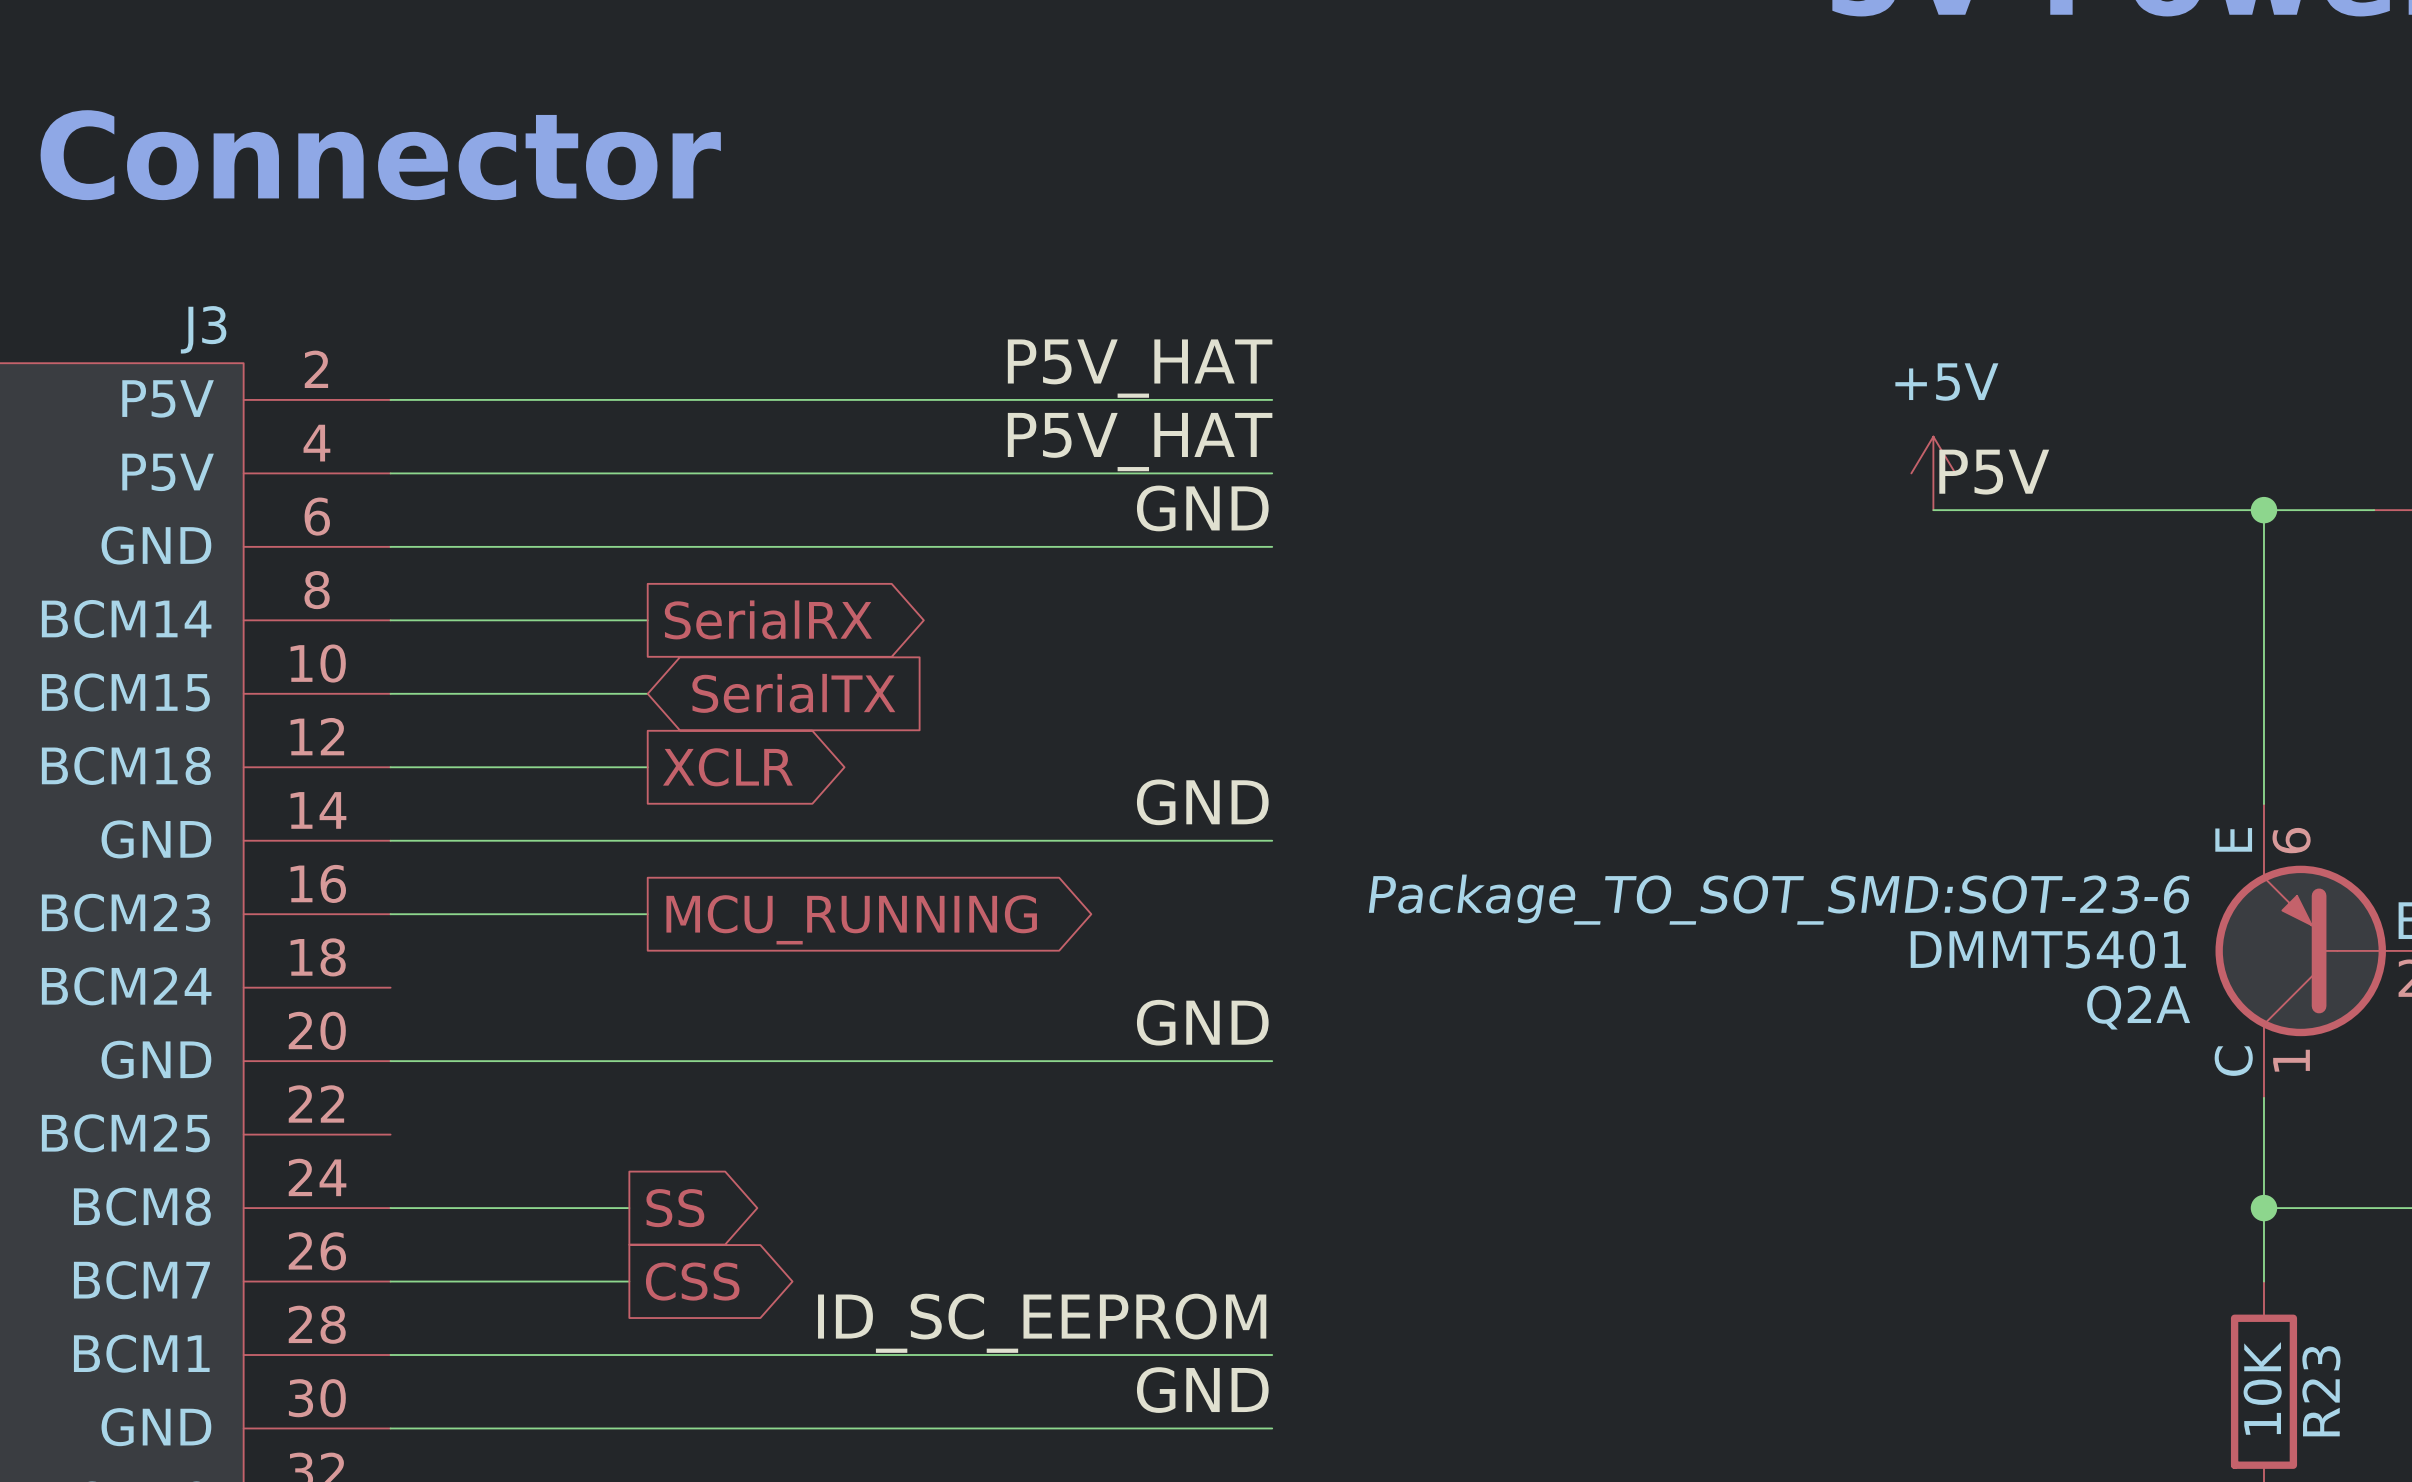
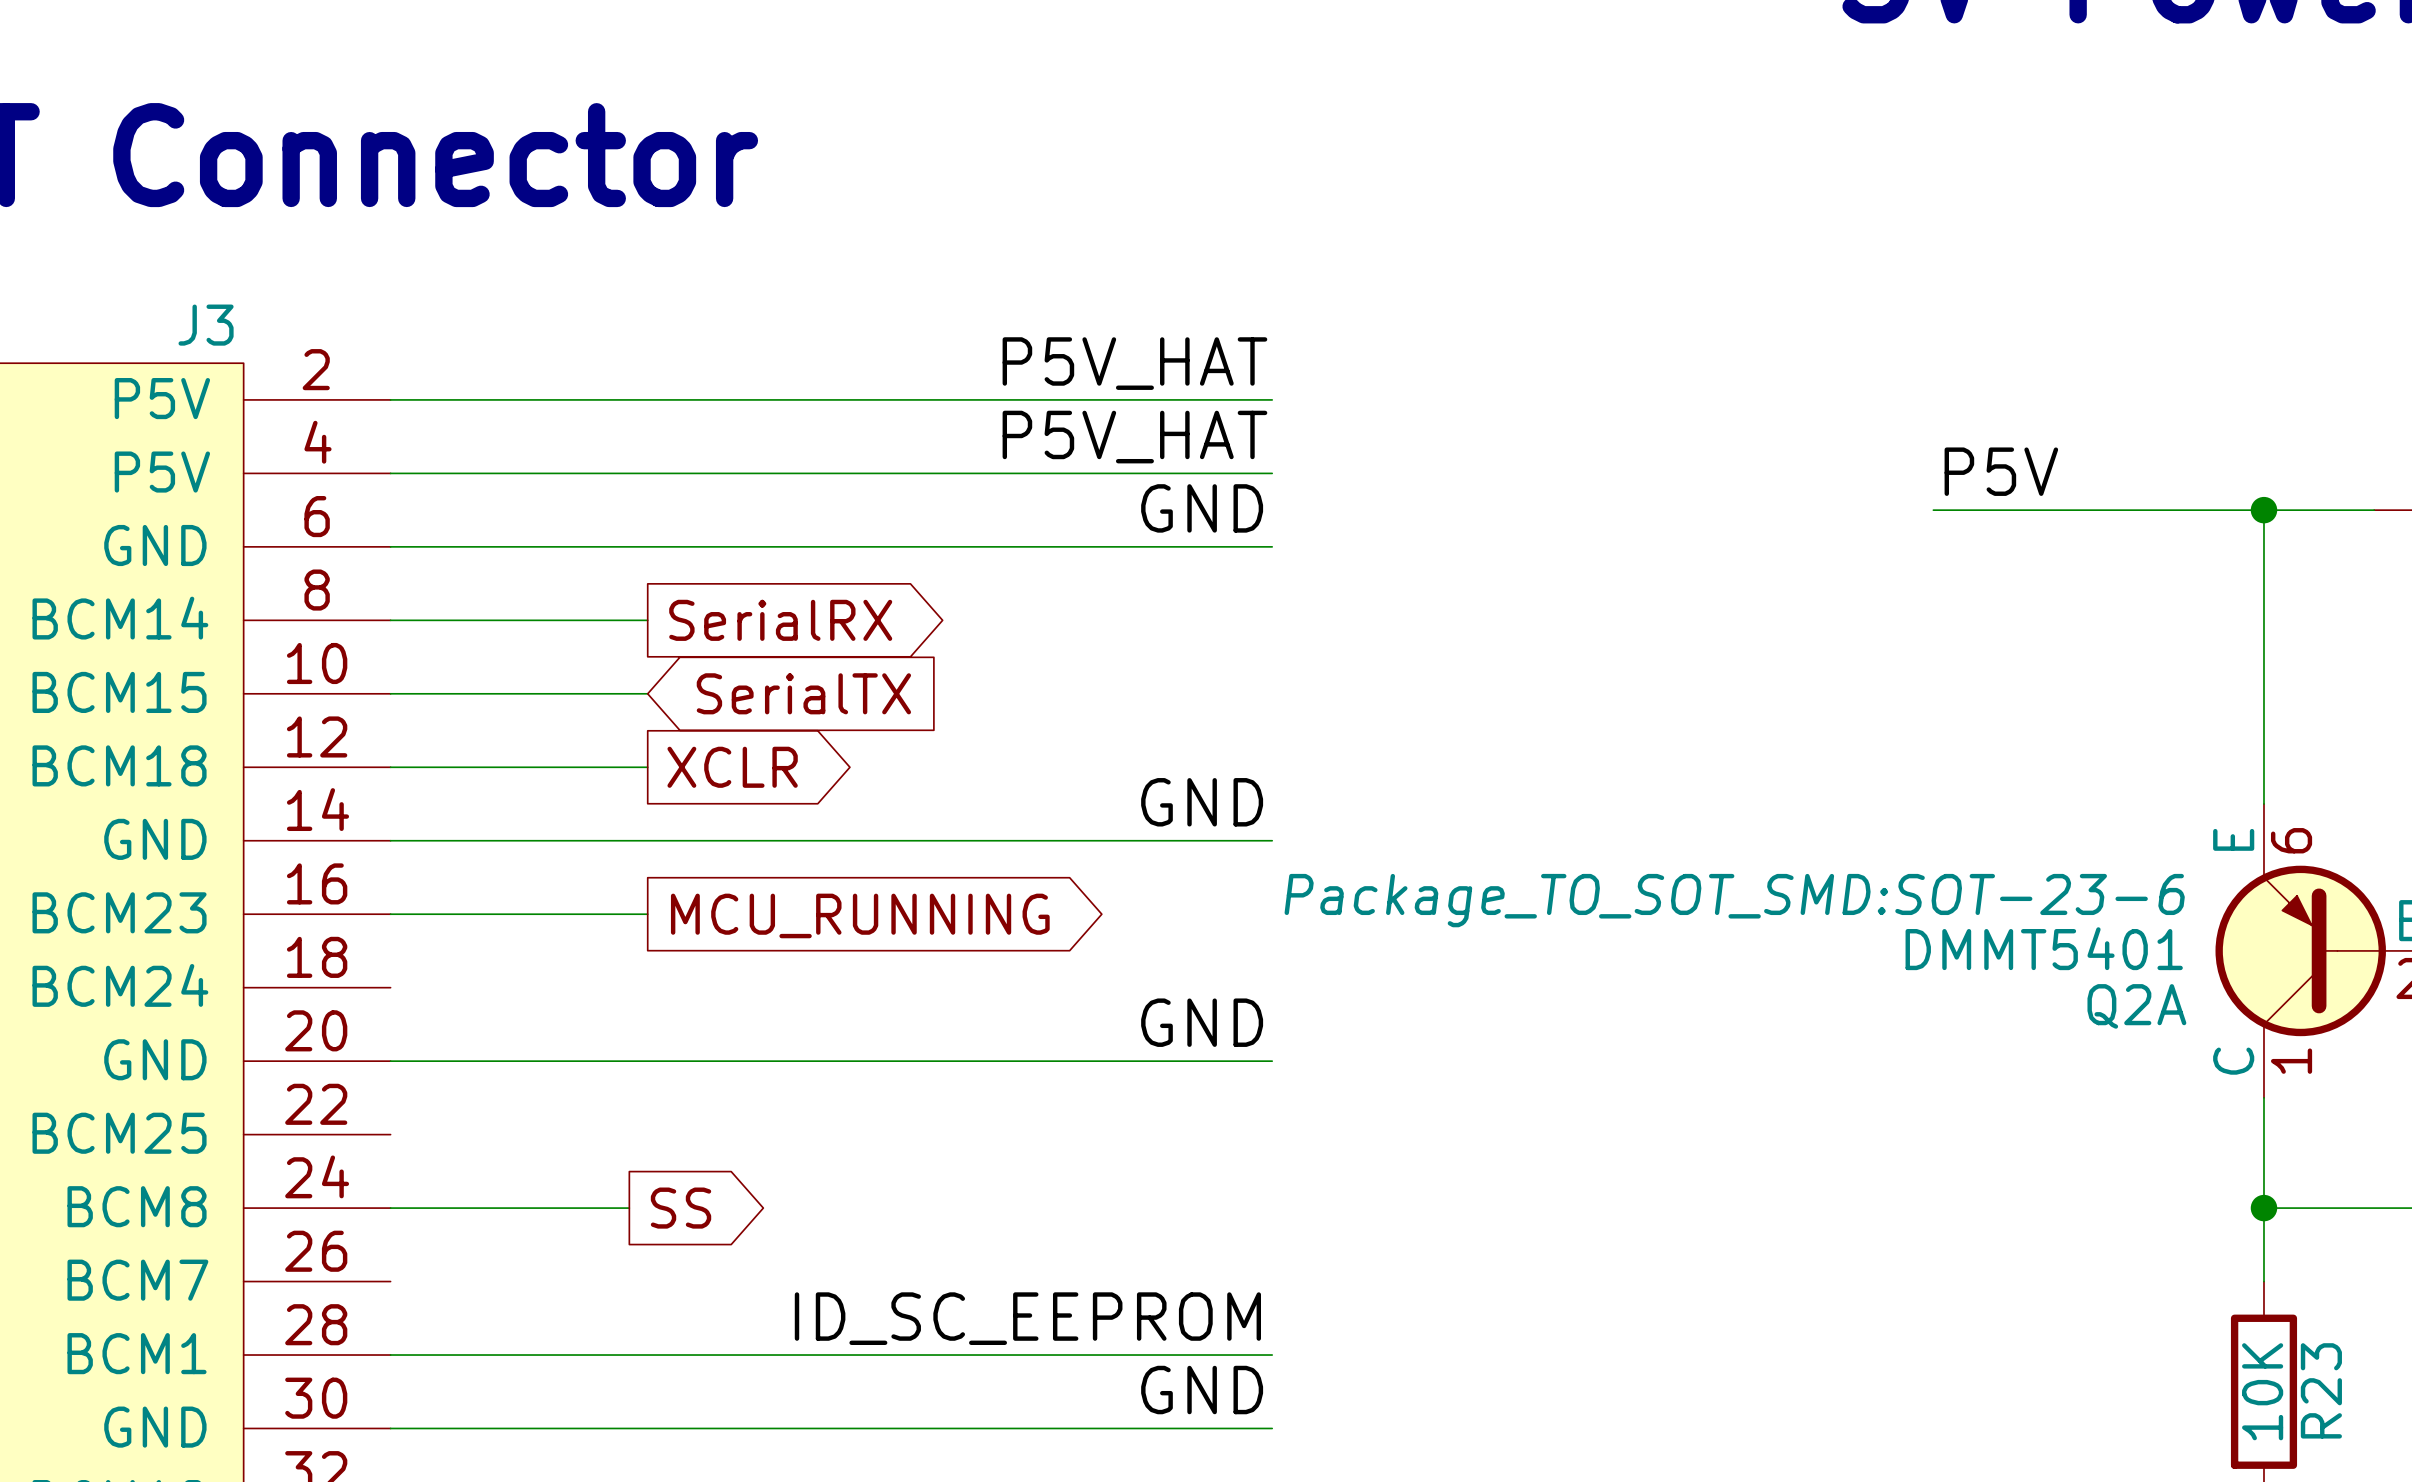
power symbol: +5V (1933, 473) -> none
wire: (390, 1281) (629, 1281) -> none
global label: CSS (692, 1281) -> none

